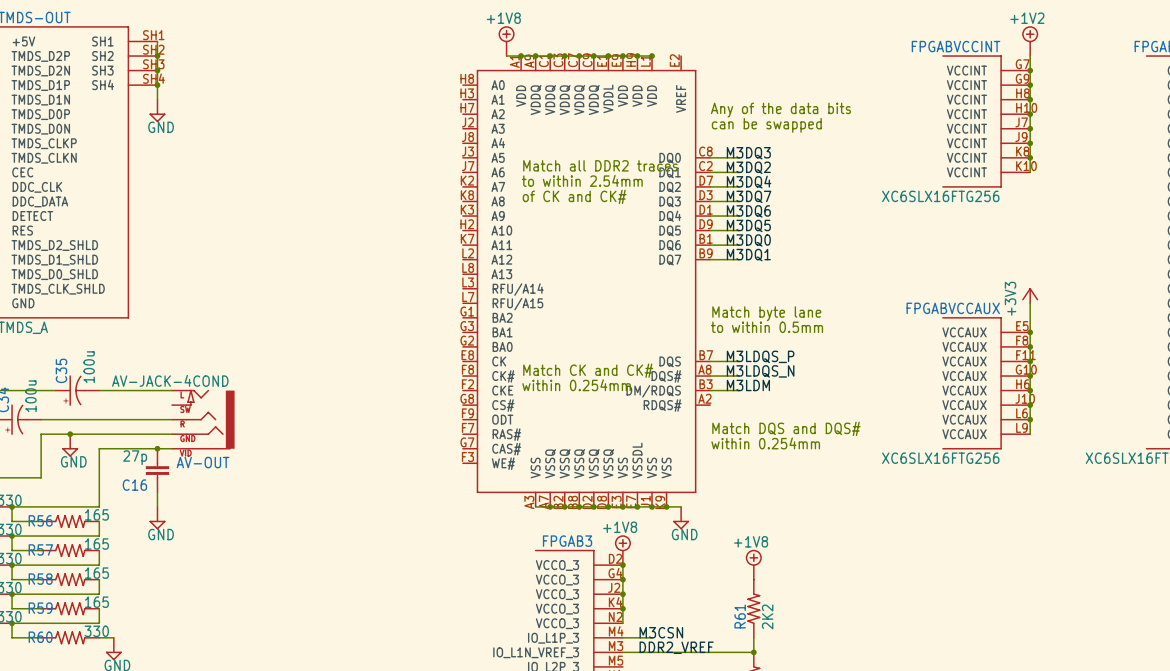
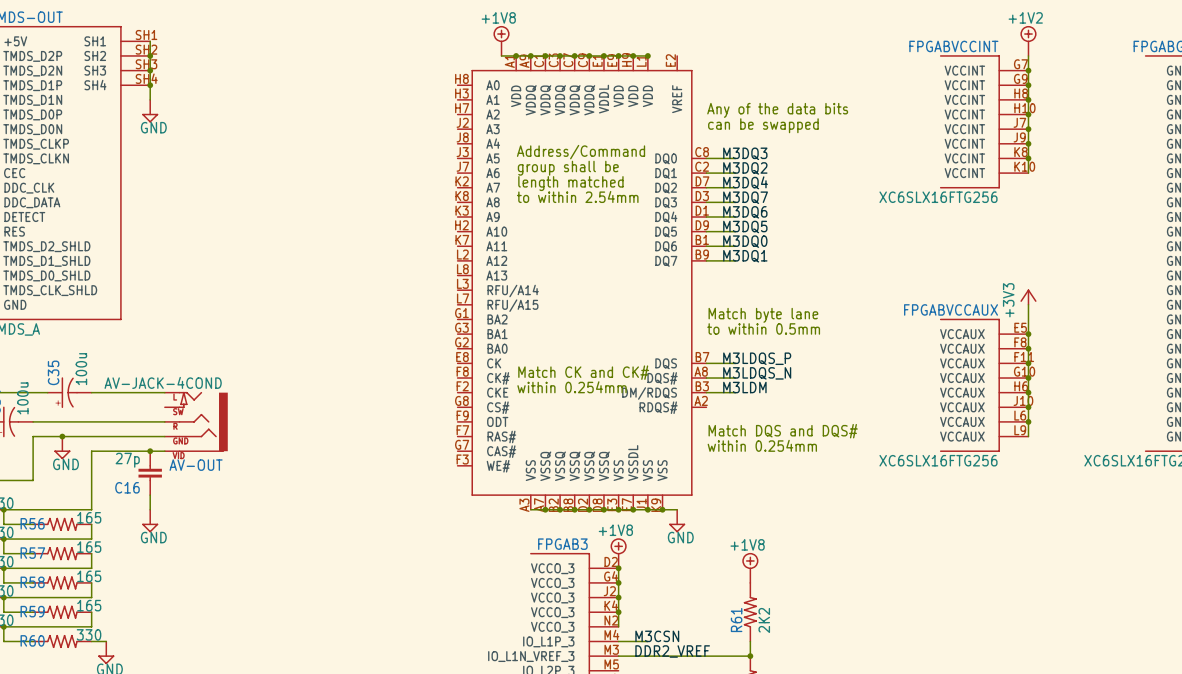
text: none -> Address/Command (581, 152)
text: Match all DDR2 traces (600, 165) -> group shall be (568, 168)
text: to within 2.54mm (582, 180) -> length matched (570, 183)
text: of CK and CK# (574, 196) -> to within 2.54mm (577, 196)

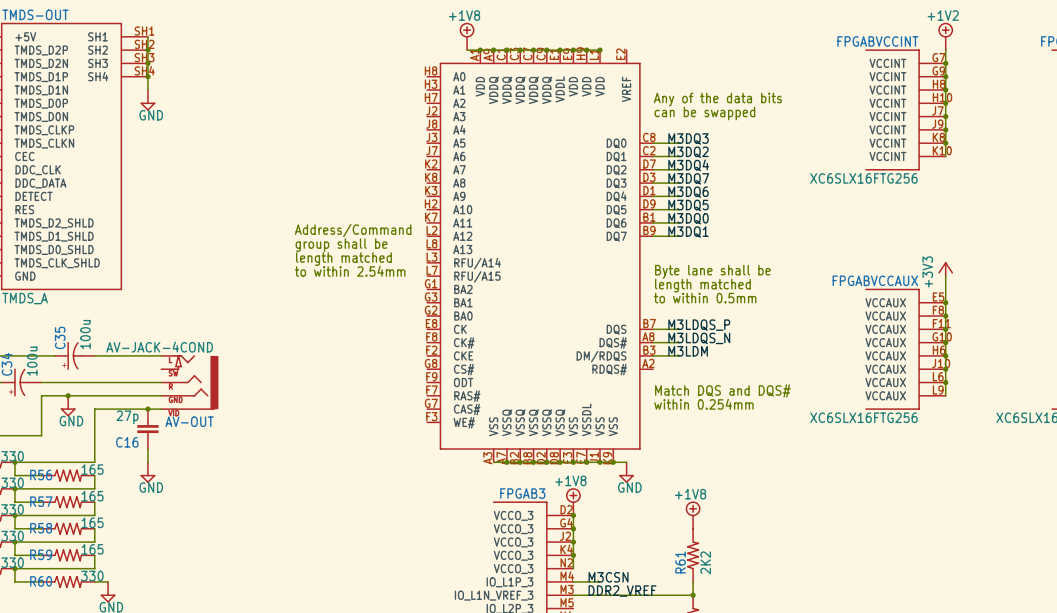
text: Address/Command (581, 152) -> none
text: group shall be (568, 168) -> none
text: length matched (570, 183) -> none
text: to within 2.54mm (577, 196) -> none
text: none -> Address/Command (353, 230)
text: none -> group shall be (341, 245)
text: none -> length matched (343, 259)
text: none -> to within 2.54mm (350, 271)
text: none -> Byte lane shall be (712, 271)
text: Match byte lane (763, 315) -> length matched (702, 285)
text: Match CK and CK# (583, 372) -> none
text: within 0.254mm (572, 387) -> none

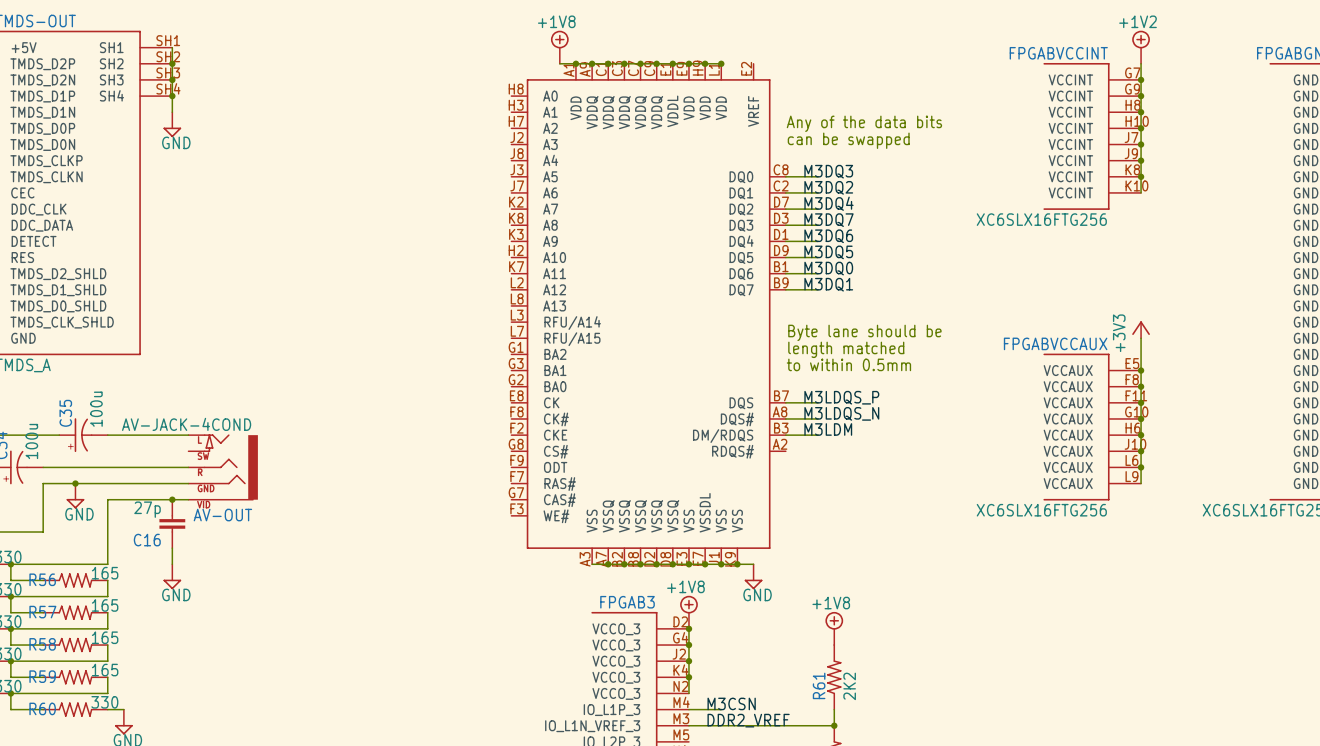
text: Address/Command (353, 230) -> none
text: group shall be (341, 245) -> none
text: length matched (343, 259) -> none
text: to within 2.54mm (350, 271) -> none
text: Byte lane shall be (712, 271) -> Byte lane should be (864, 332)
text: Match DQS and DQS# (722, 390) -> none
text: within 0.254mm (703, 404) -> none

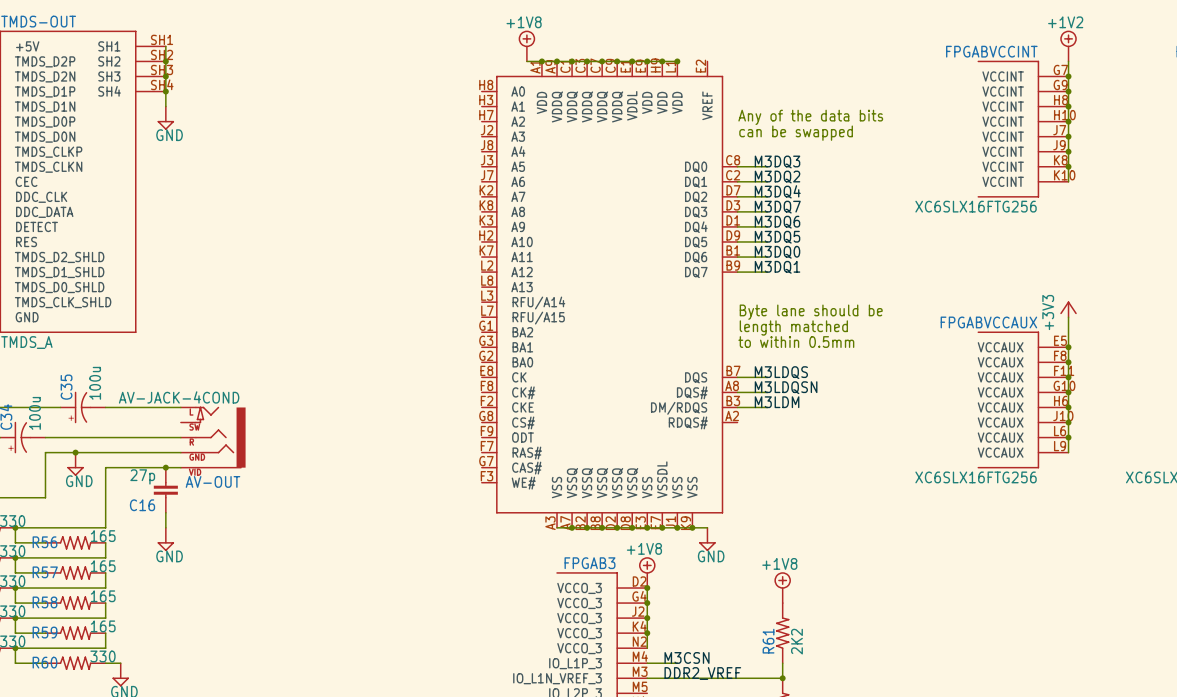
label: M3LDQS_P (841, 397) -> M3LDQS (781, 372)
label: M3LDQS_N (841, 413) -> M3LDQSN (786, 387)

